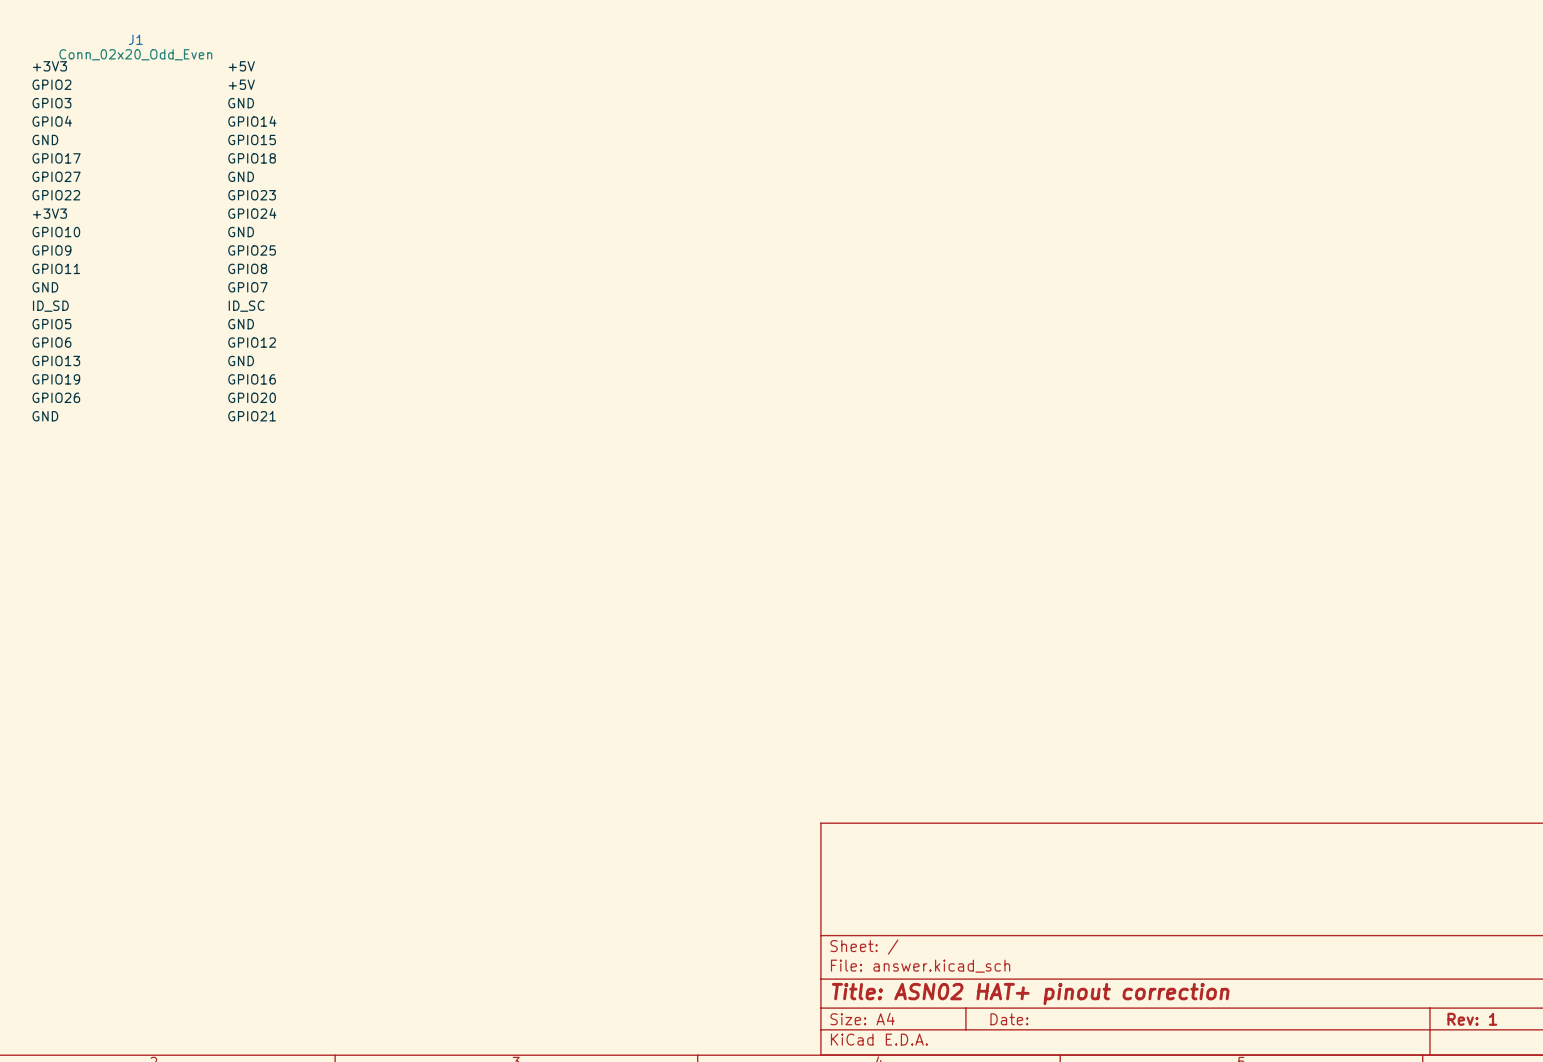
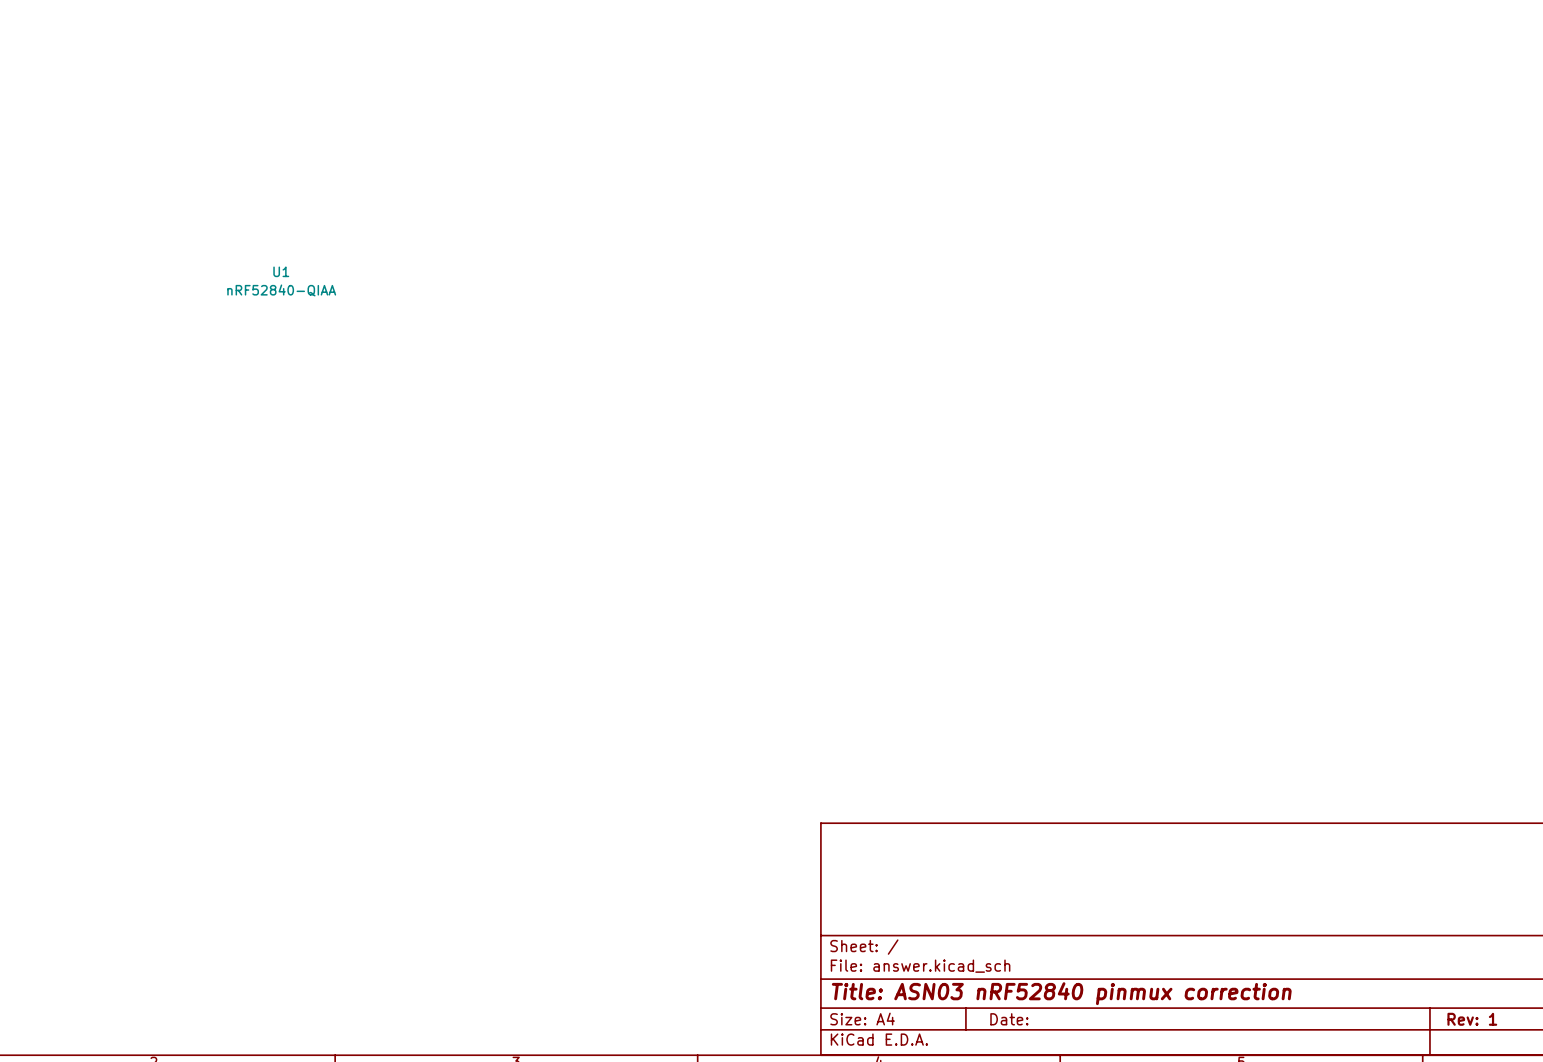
J1: Conn_02x20_Odd_Even (135, 47) -> none
label: +3V3 (49, 66) -> none
label: +5V (241, 66) -> none
label: GPIO2 (51, 84) -> none
label: +5V (241, 84) -> none
label: GPIO3 (51, 103) -> none
label: GND (241, 103) -> none
label: GPIO4 (52, 121) -> none
label: GPIO14 (252, 121) -> none
label: GND (45, 139) -> none
label: GPIO15 (252, 139) -> none
label: GPIO17 (56, 158) -> none
label: GPIO18 (252, 158) -> none
label: GPIO27 (56, 176) -> none
label: GND (241, 176) -> none
label: GPIO22 (56, 195) -> none
label: GPIO23 (252, 195) -> none
label: +3V3 (49, 213) -> none
label: GPIO24 (252, 213) -> none
label: GPIO10 (56, 232) -> none
label: GND (241, 232) -> none
label: GPIO9 (51, 250) -> none
label: GPIO25 (252, 250) -> none
label: GPIO11 (56, 268) -> none
label: GPIO8 (247, 268) -> none
U1: none -> nRF52840-QIAA (281, 281)
label: GND (45, 287) -> none
label: GPIO7 (247, 287) -> none
label: ID_SD (50, 306) -> none
label: ID_SC (246, 306) -> none
label: GPIO5 (51, 324) -> none
label: GND (241, 324) -> none
label: GPIO6 (51, 342) -> none
label: GPIO12 (252, 342) -> none
label: GPIO13 (56, 360) -> none
label: GND (241, 360) -> none
label: GPIO19 (56, 379) -> none
label: GPIO16 (252, 379) -> none
label: GPIO26 (56, 397) -> none
label: GPIO20 (252, 397) -> none
label: GND (45, 416) -> none
label: GPIO21 (252, 416) -> none
title block: Title: ASN02 HAT+ pinout correction (1030, 994) -> Title: ASN03 nRF52840 pinmux correction (1061, 993)

